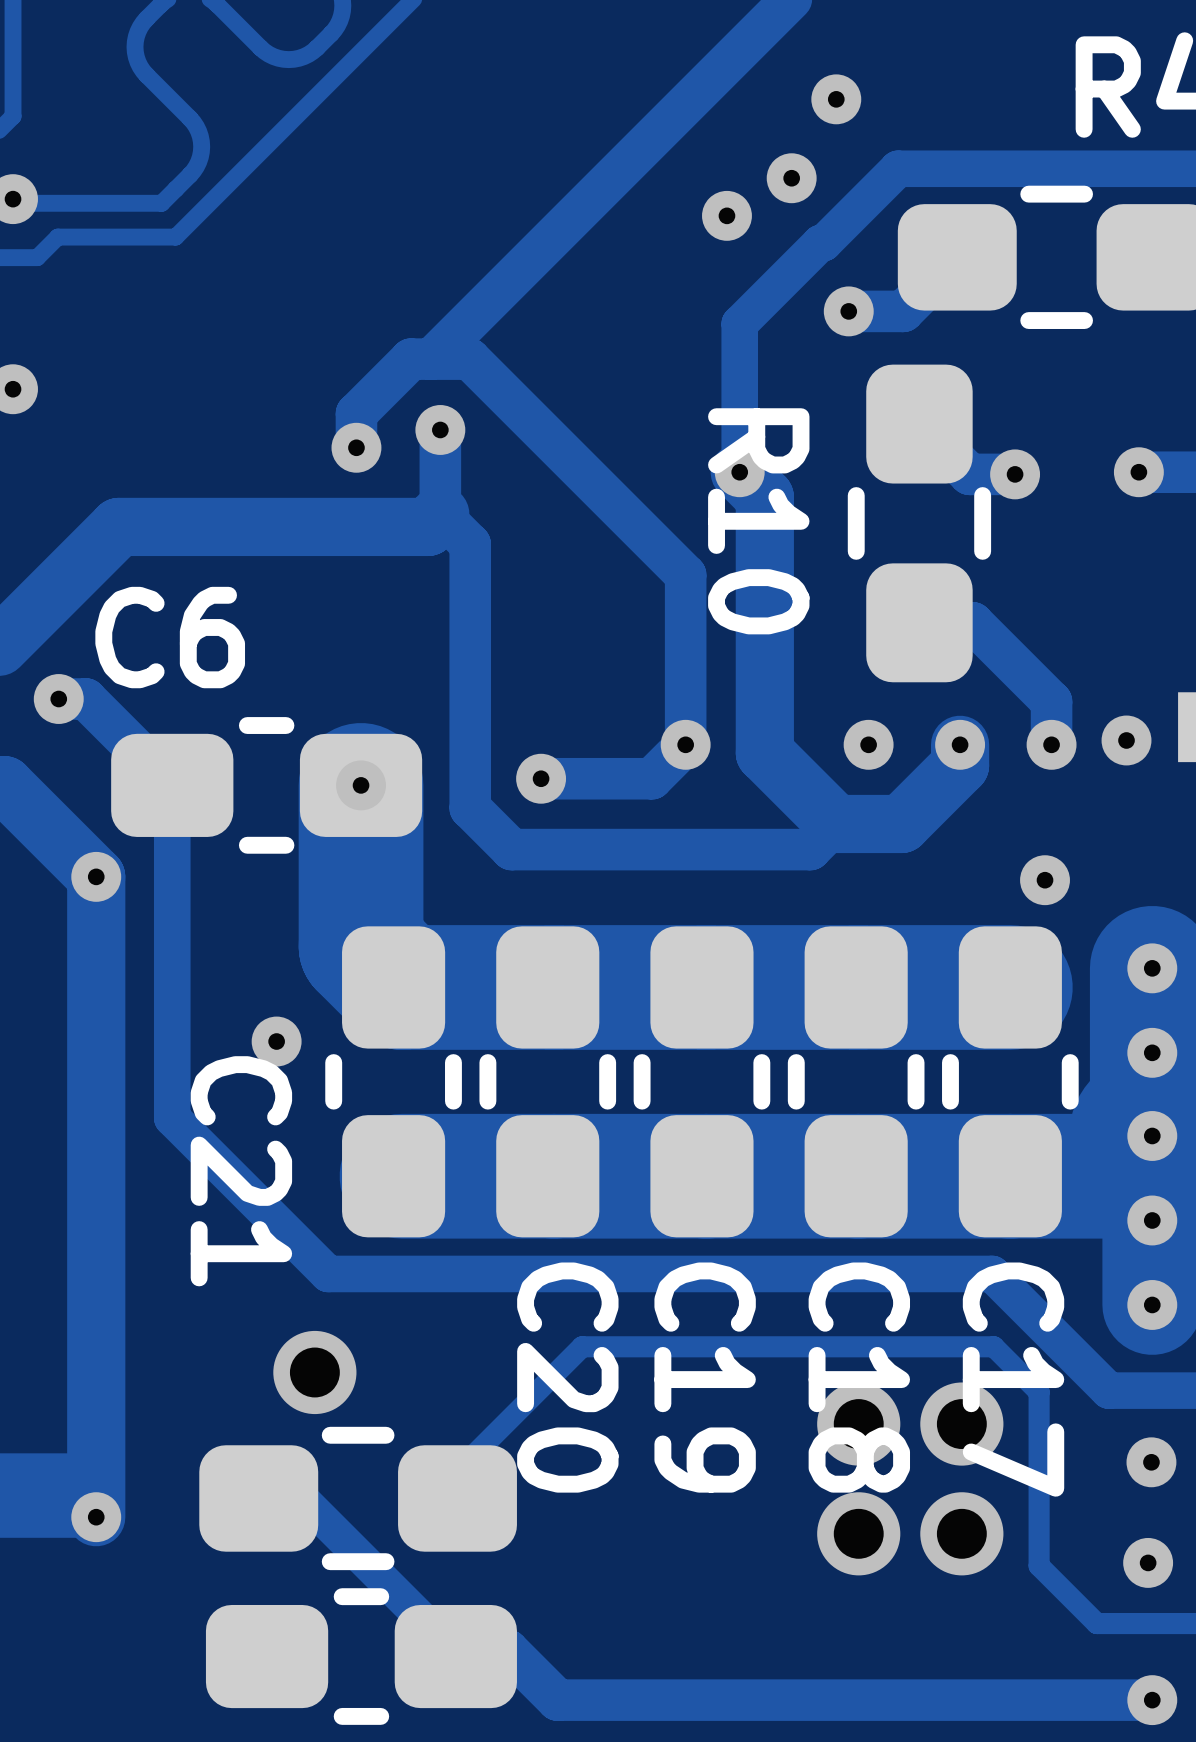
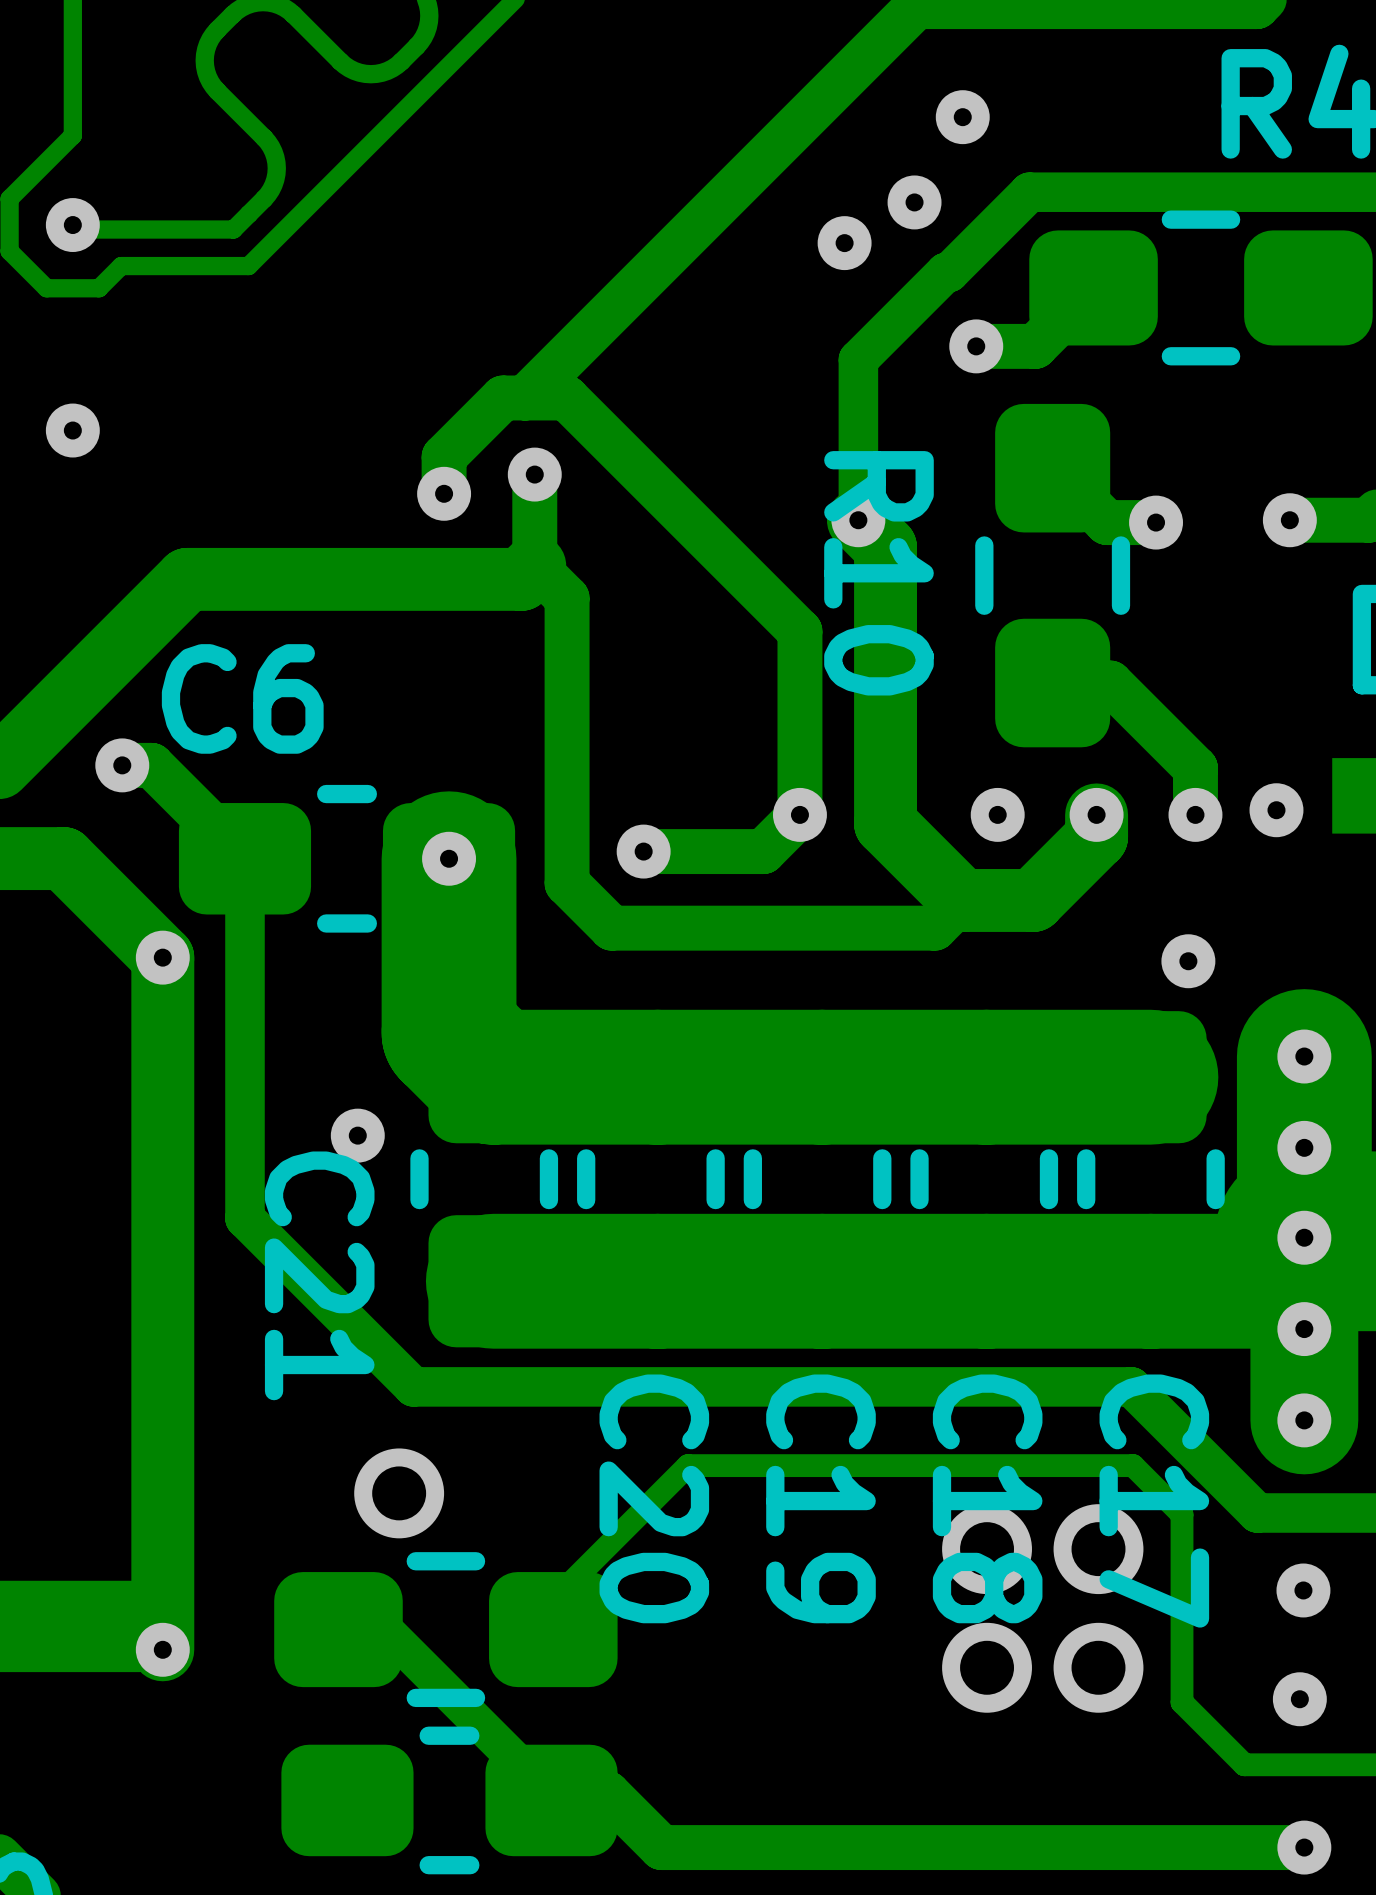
C20 name position: C20 (567, 1377) -> C20 (654, 1498)

